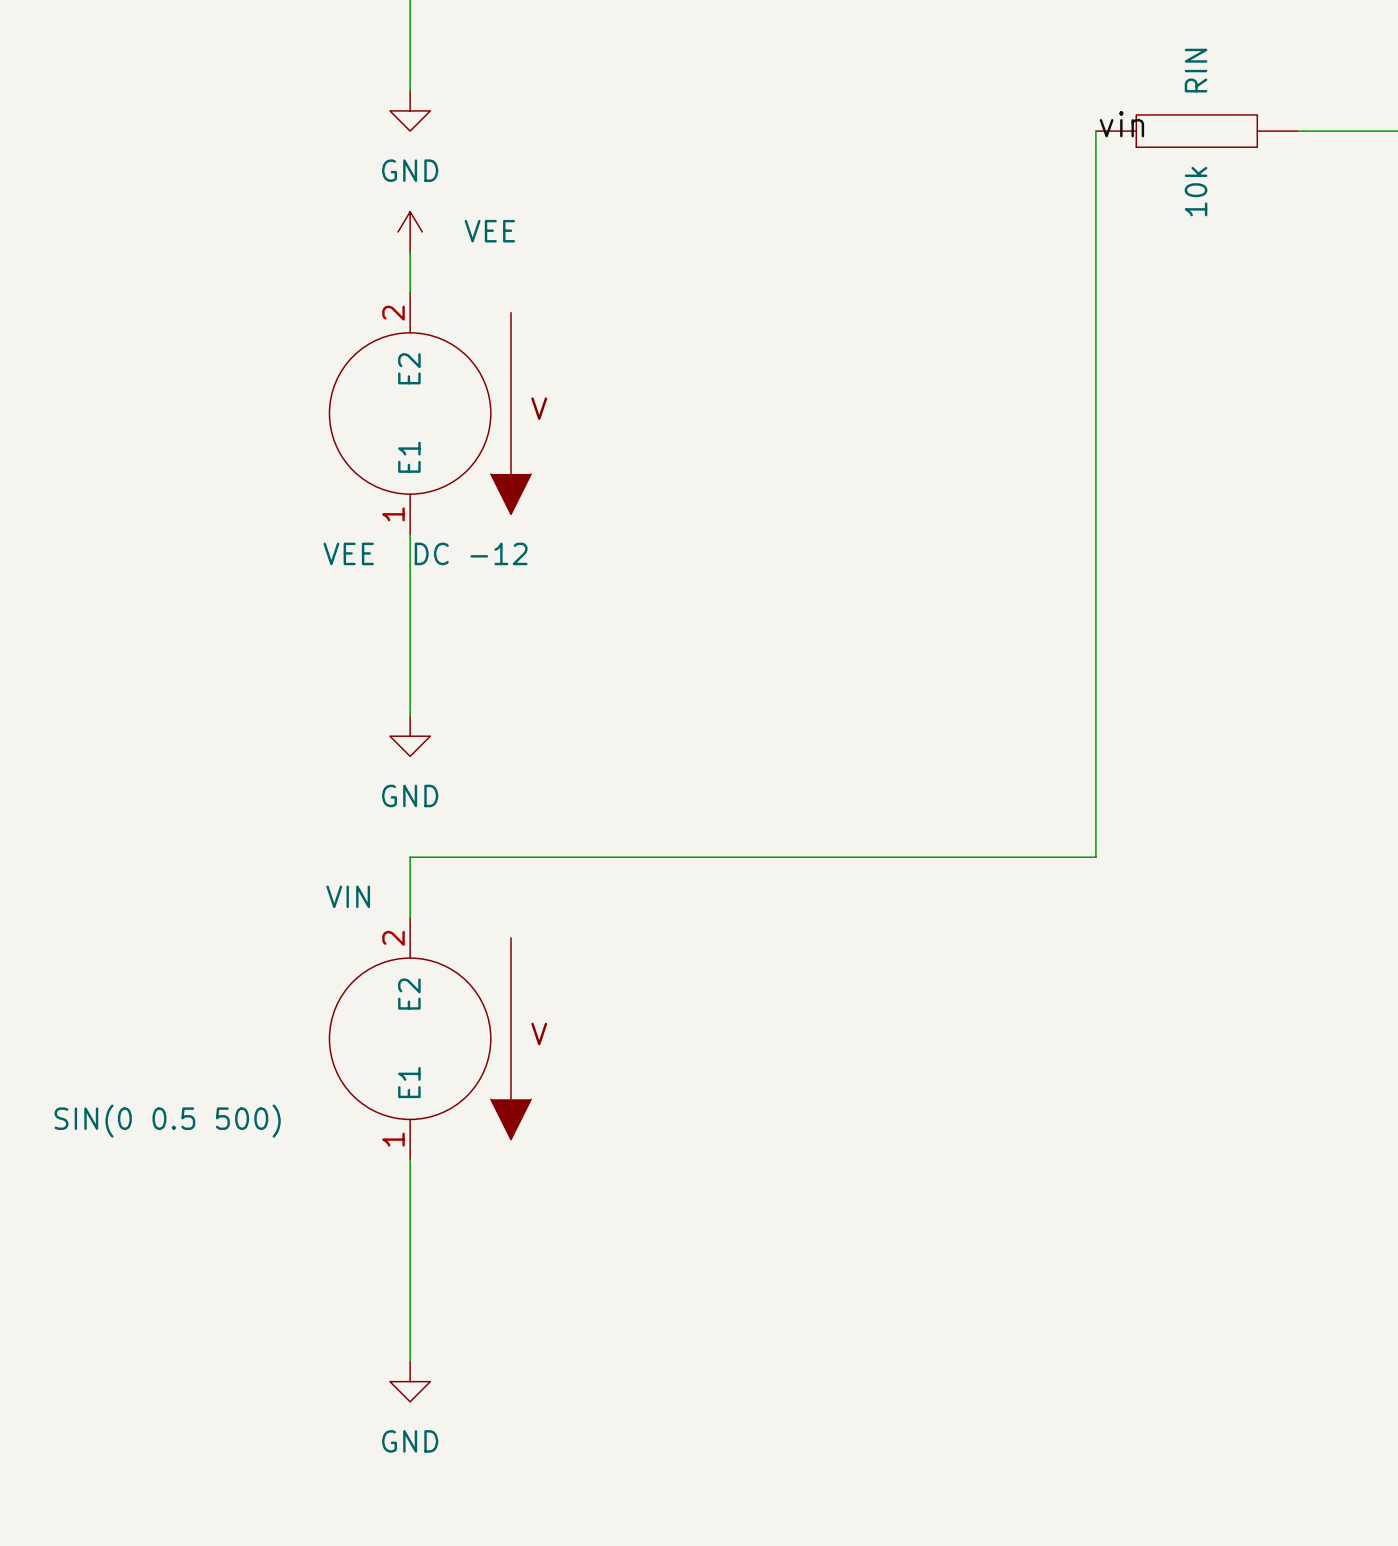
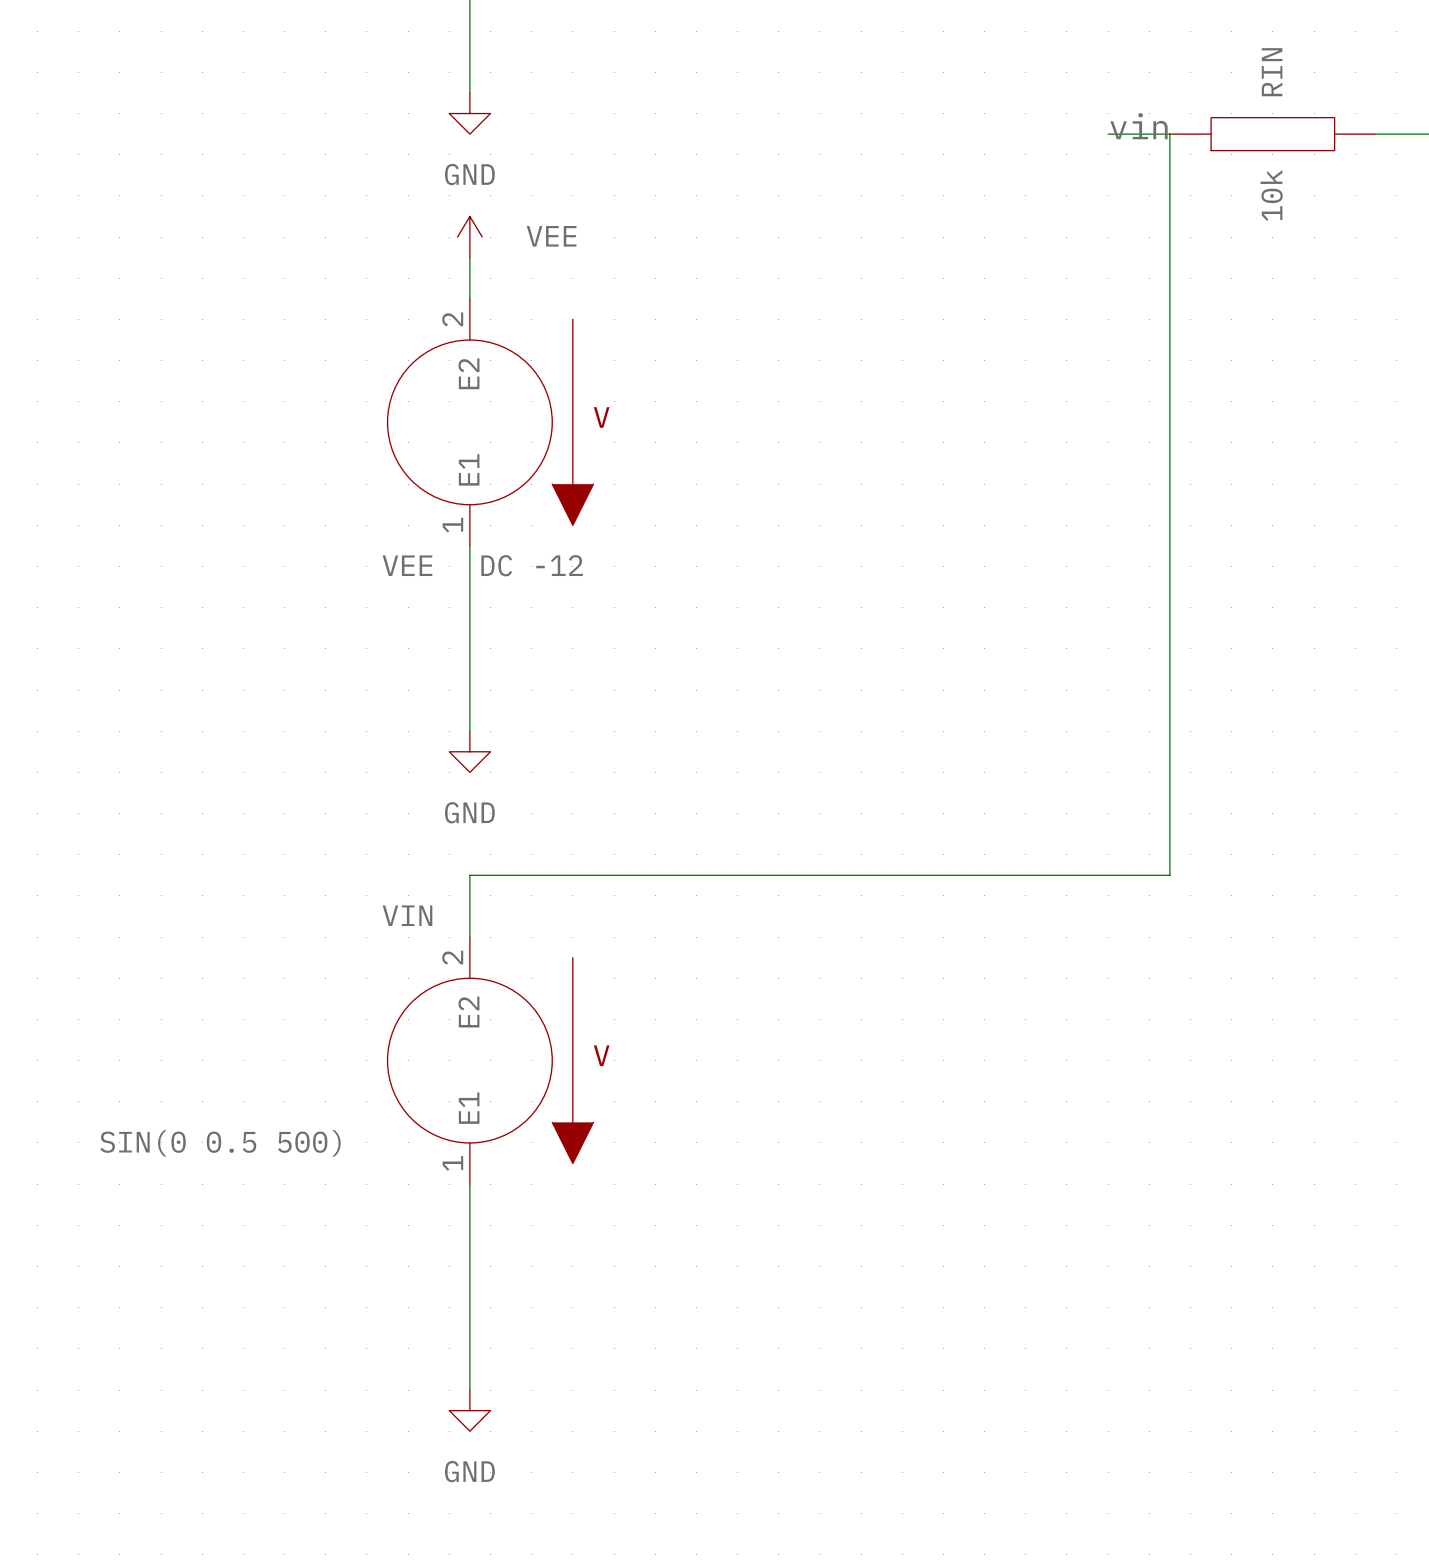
label position: vin (1121, 124) -> vin (1139, 126)
wire: none -> (1108, 134) (1169, 134)

